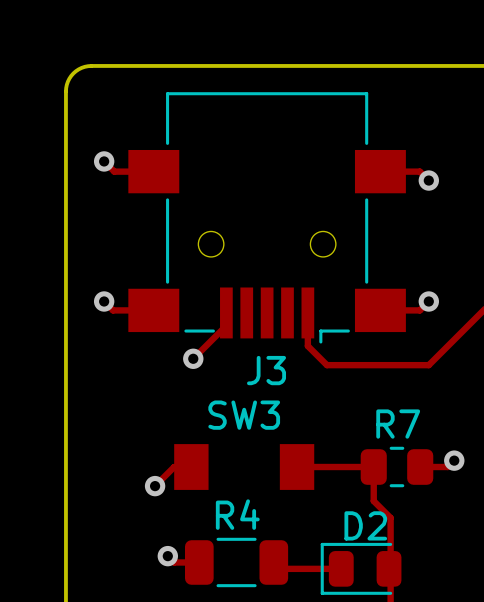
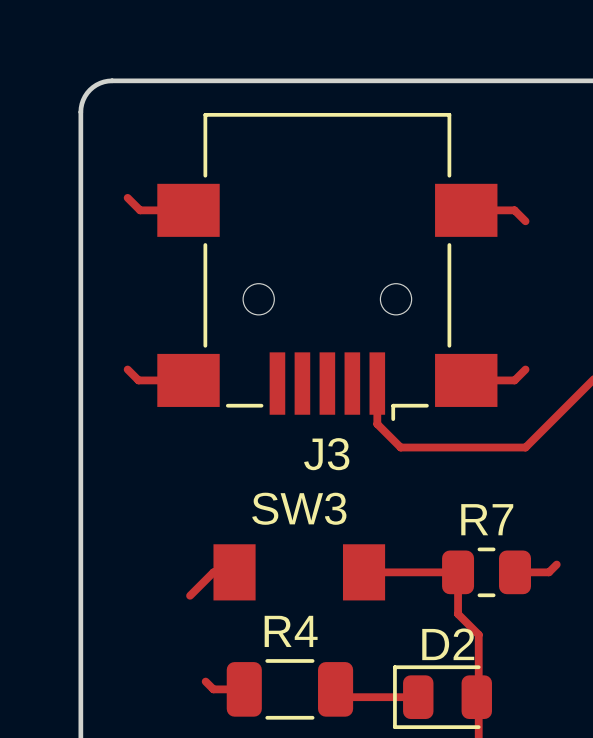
via: (104, 161) -> none
via: (428, 180) -> none
via: (104, 301) -> none
via: (428, 301) -> none
track: (226, 312) (226, 325) (193, 358) -> none
via: (193, 358) -> none
via: (454, 460) -> none
via: (155, 486) -> none
via: (167, 556) -> none

